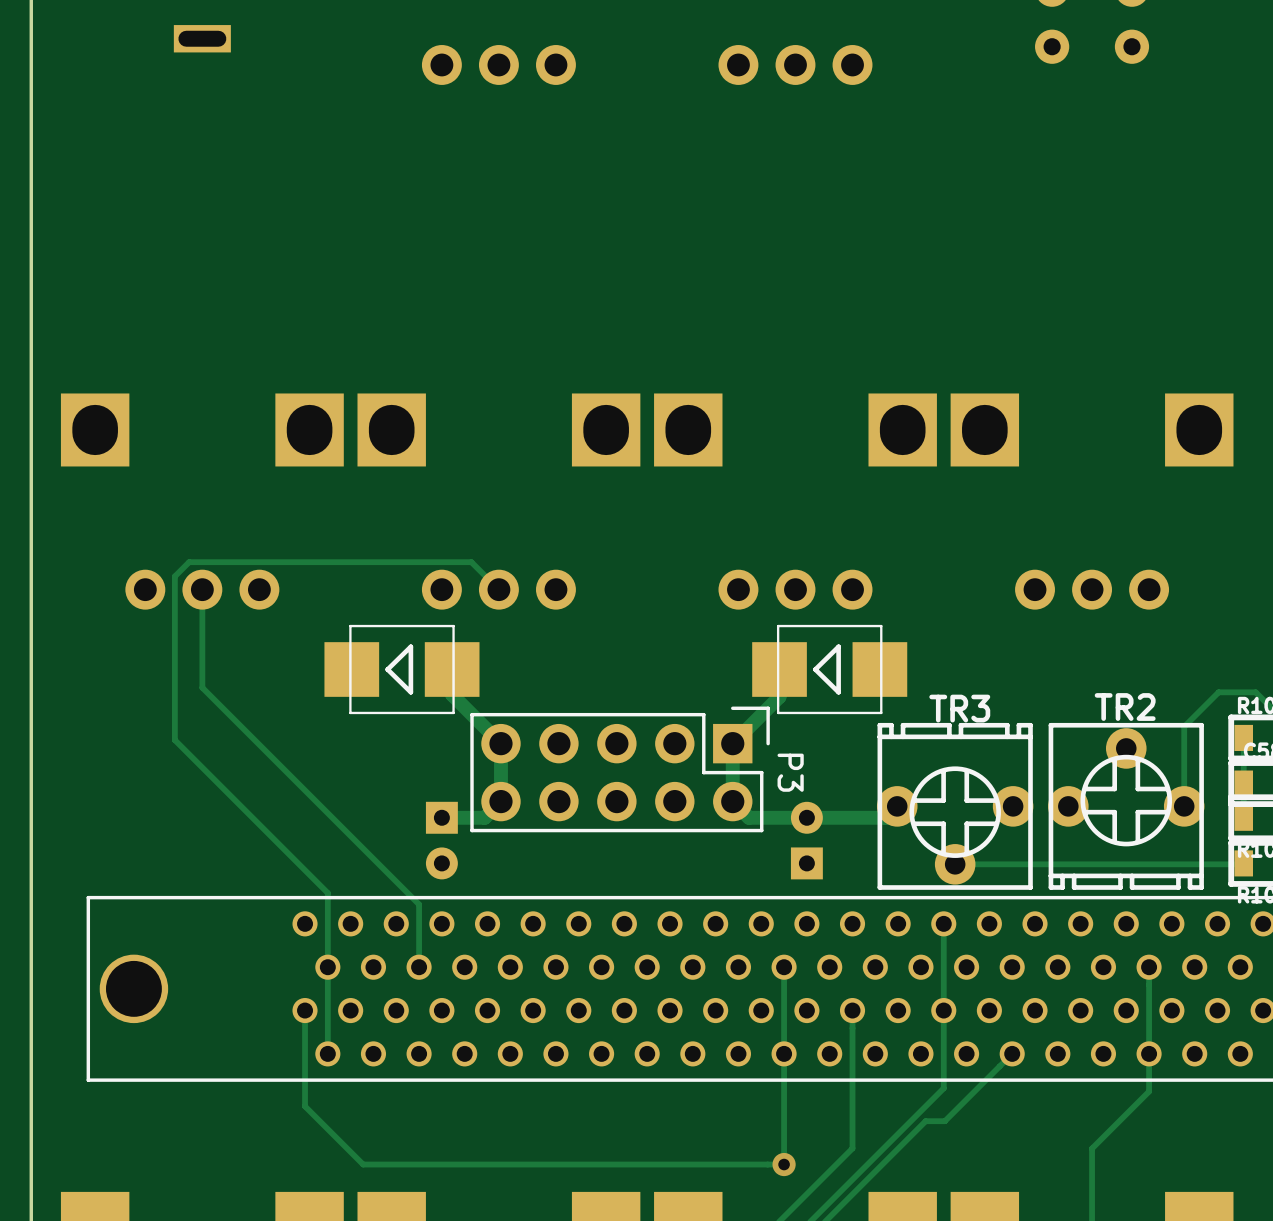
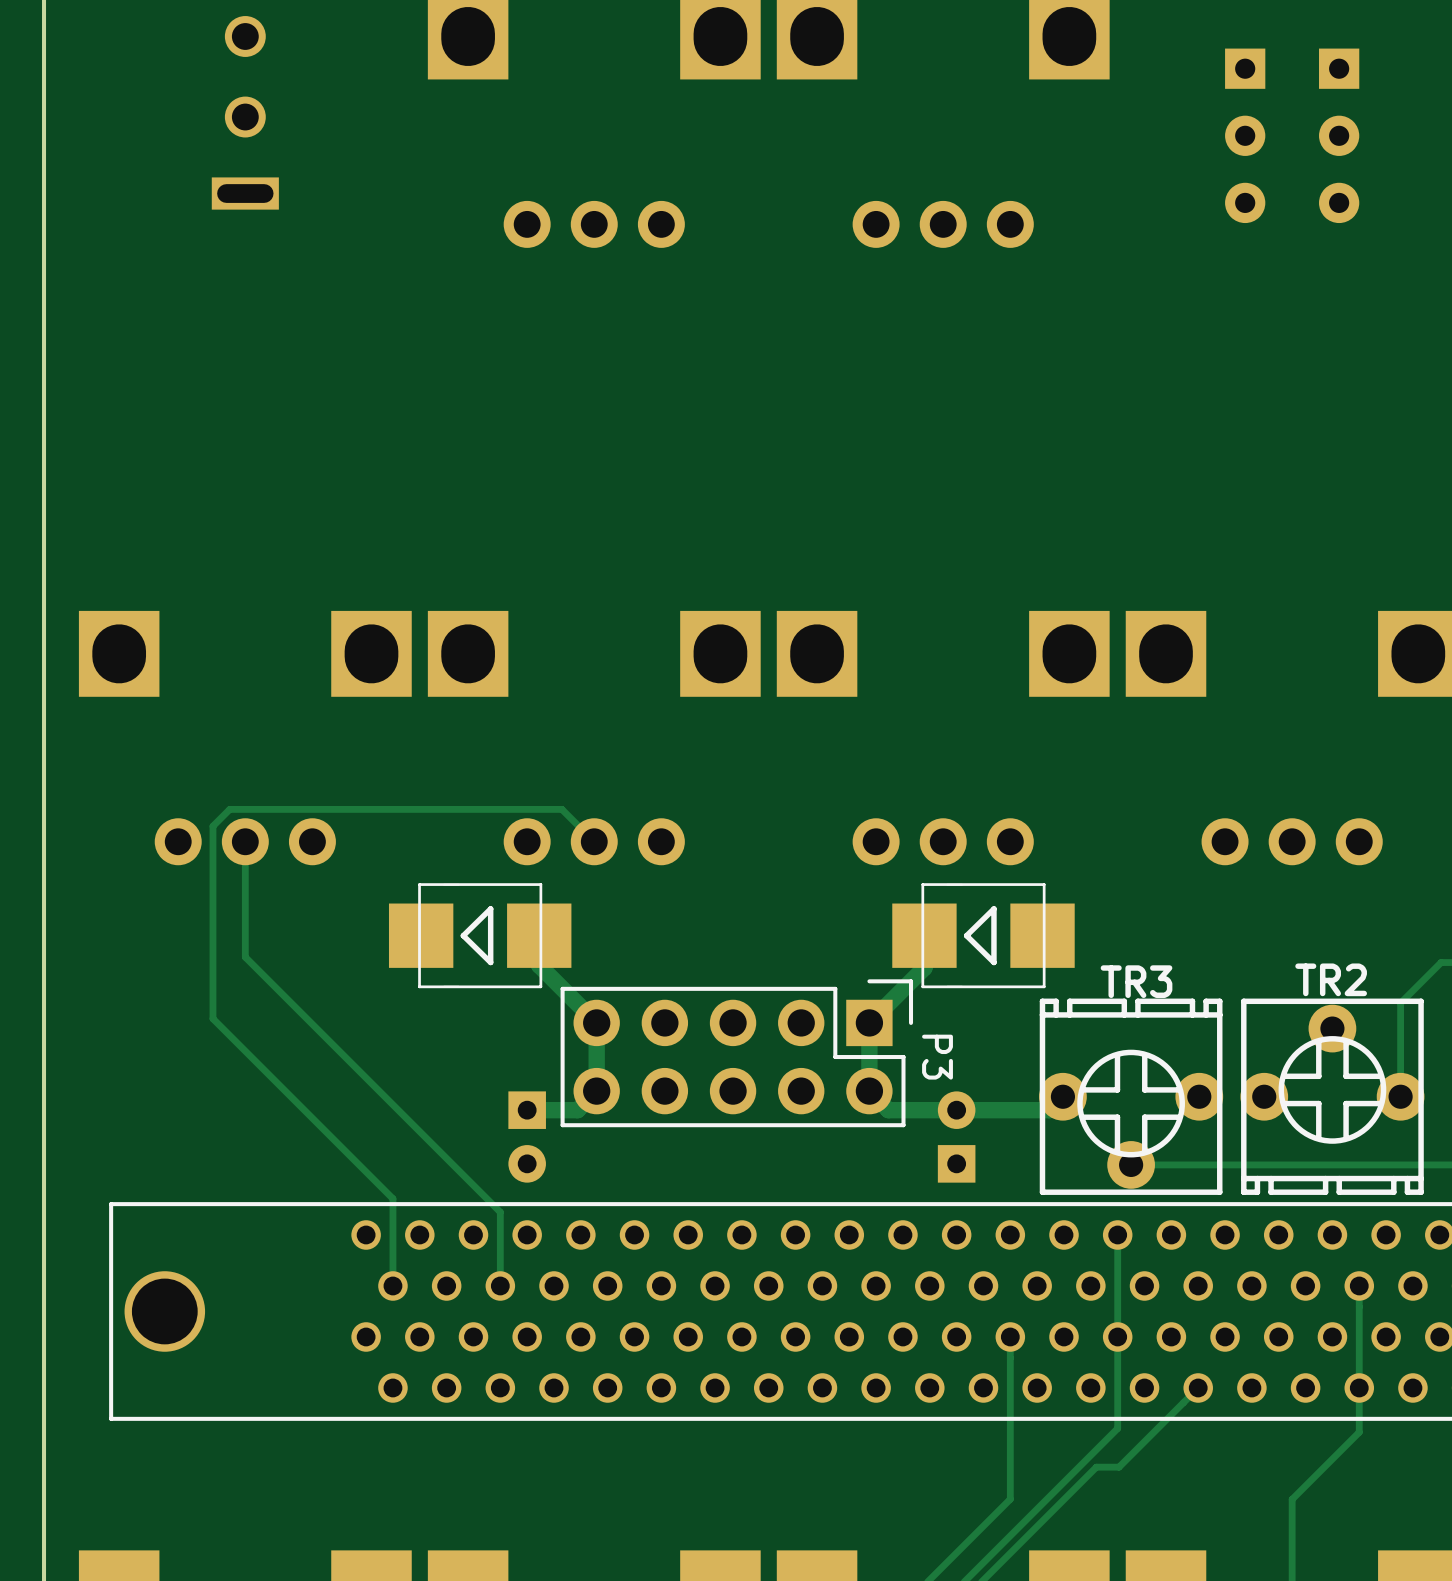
track: (327, 967) (327, 1053) -> none
track: (784, 967) (784, 1164) (363, 1164) (305, 1106) (305, 1010) -> none
via: (784, 1164) -> none

